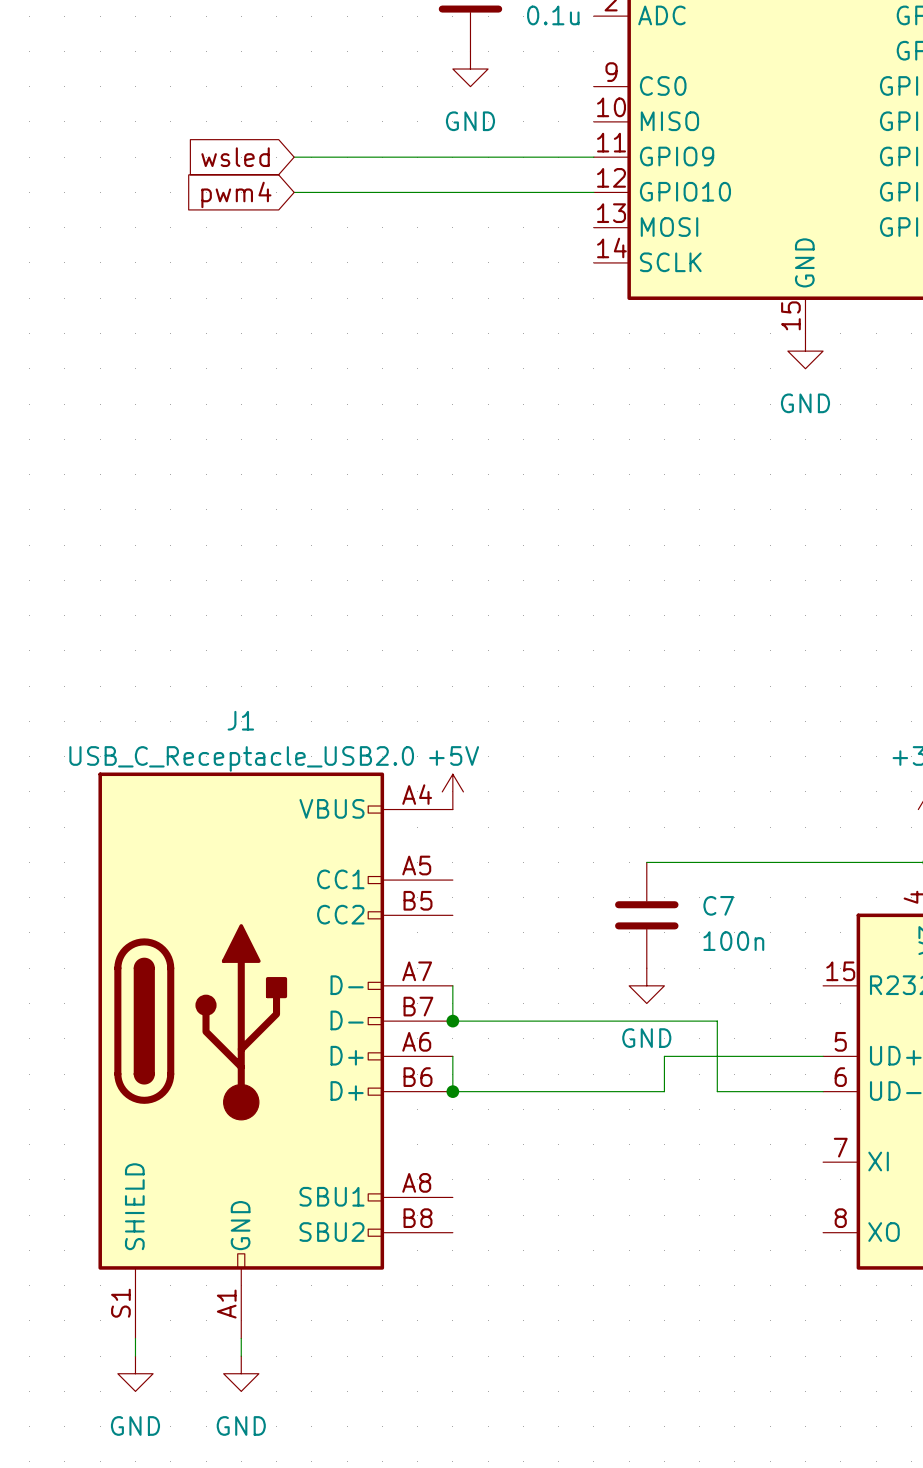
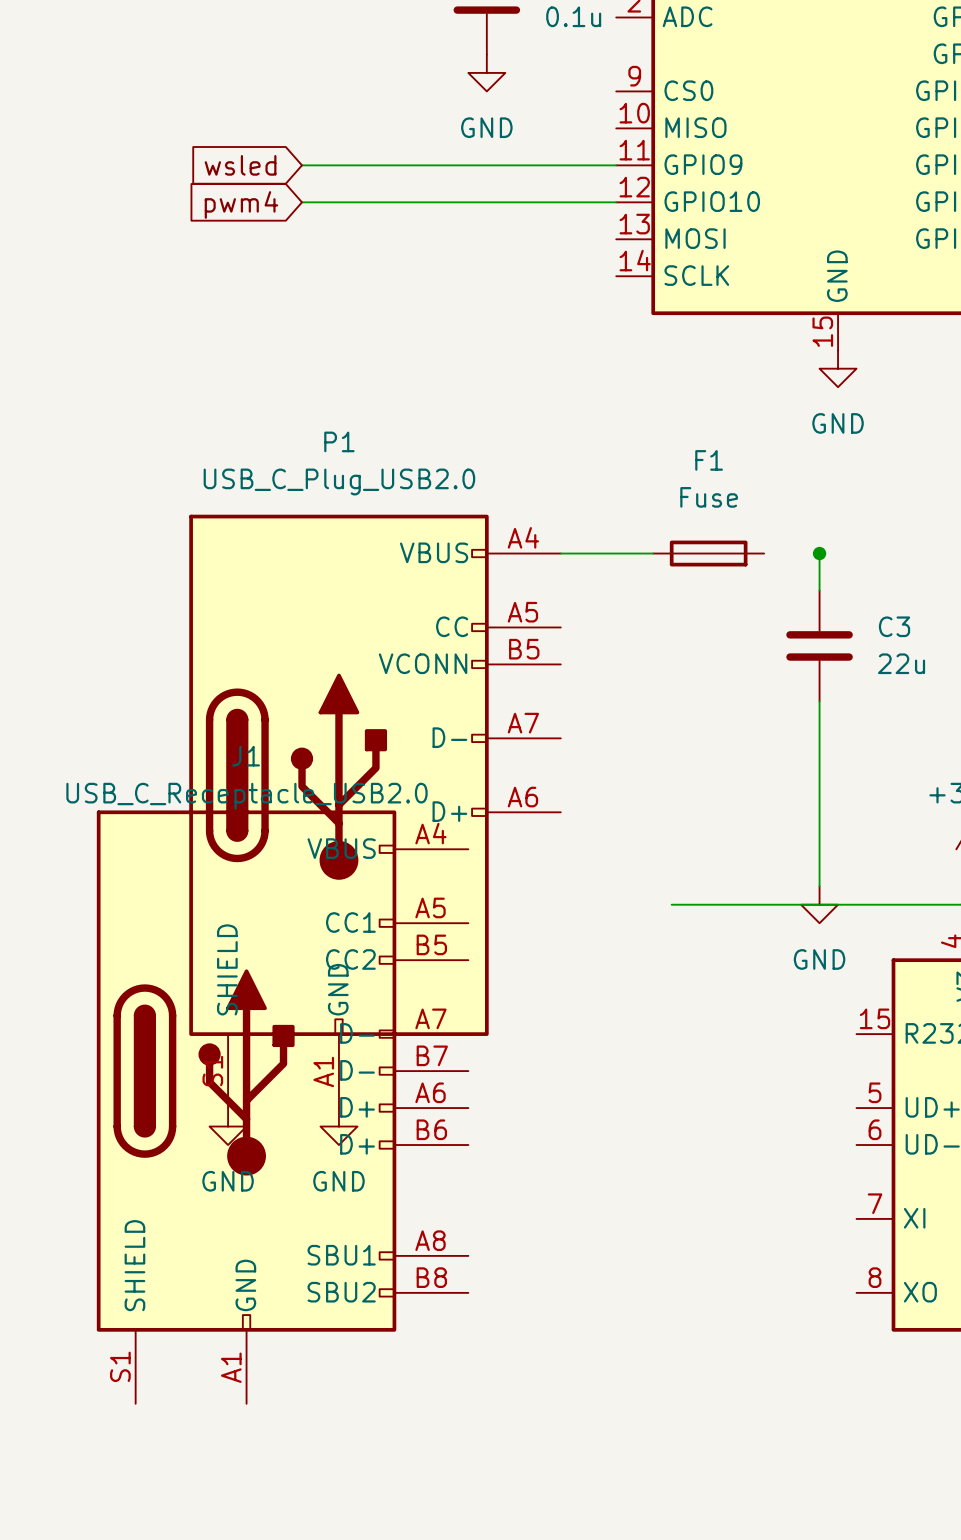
wire: none -> (560, 553) (653, 553)
F1: none -> Fuse (708, 553)
wire: none -> (819, 553) (819, 590)
junction: none -> (819, 553)
C3: none -> 22u (819, 645)
wire: none -> (819, 701) (819, 886)
P1: none -> USB_C_Plug_USB2.0 (375, 811)
power symbol: +5V (452, 791) -> none
power symbol: none -> GND (819, 904)
C7: 100n (646, 915) -> none
wire: (452, 985) (452, 1021) (717, 1021) (717, 1091) (823, 1091) -> none
power symbol: GND (646, 985) -> none
junction: (452, 1021) -> none
wire: (452, 1056) (452, 1091) (664, 1091) (664, 1056) (823, 1056) -> none
power symbol: none -> GND (228, 1126)
power symbol: none -> GND (338, 1126)
junction: (452, 1091) -> none
wire: (135, 1338) (135, 1356) -> none
wire: (241, 1338) (241, 1356) -> none
power symbol: GND (135, 1373) -> none
power symbol: GND (241, 1373) -> none

